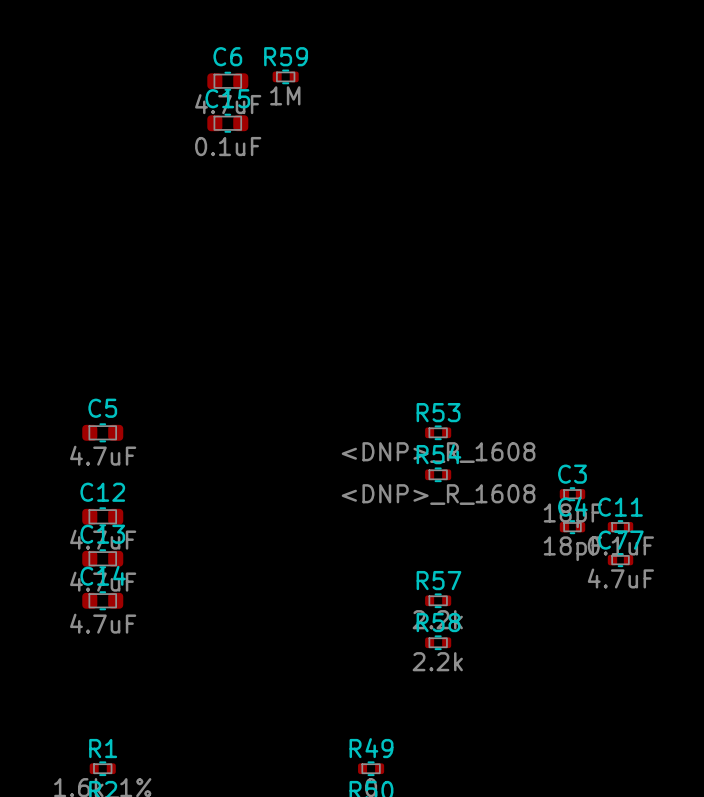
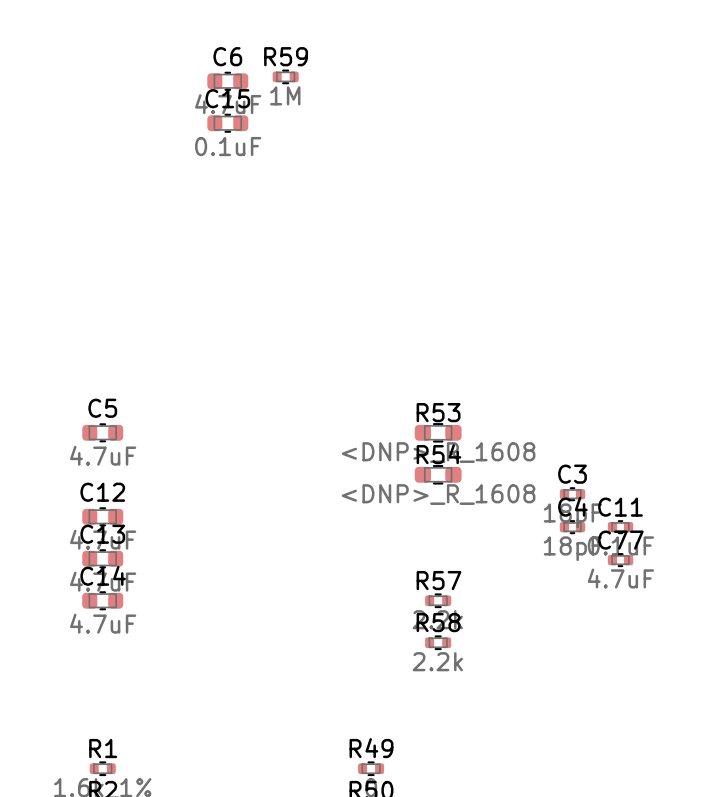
R53 footprint: [425, 425, 452, 441] -> [414, 423, 462, 443]
R54 footprint: [425, 467, 452, 483] -> [414, 465, 462, 485]

